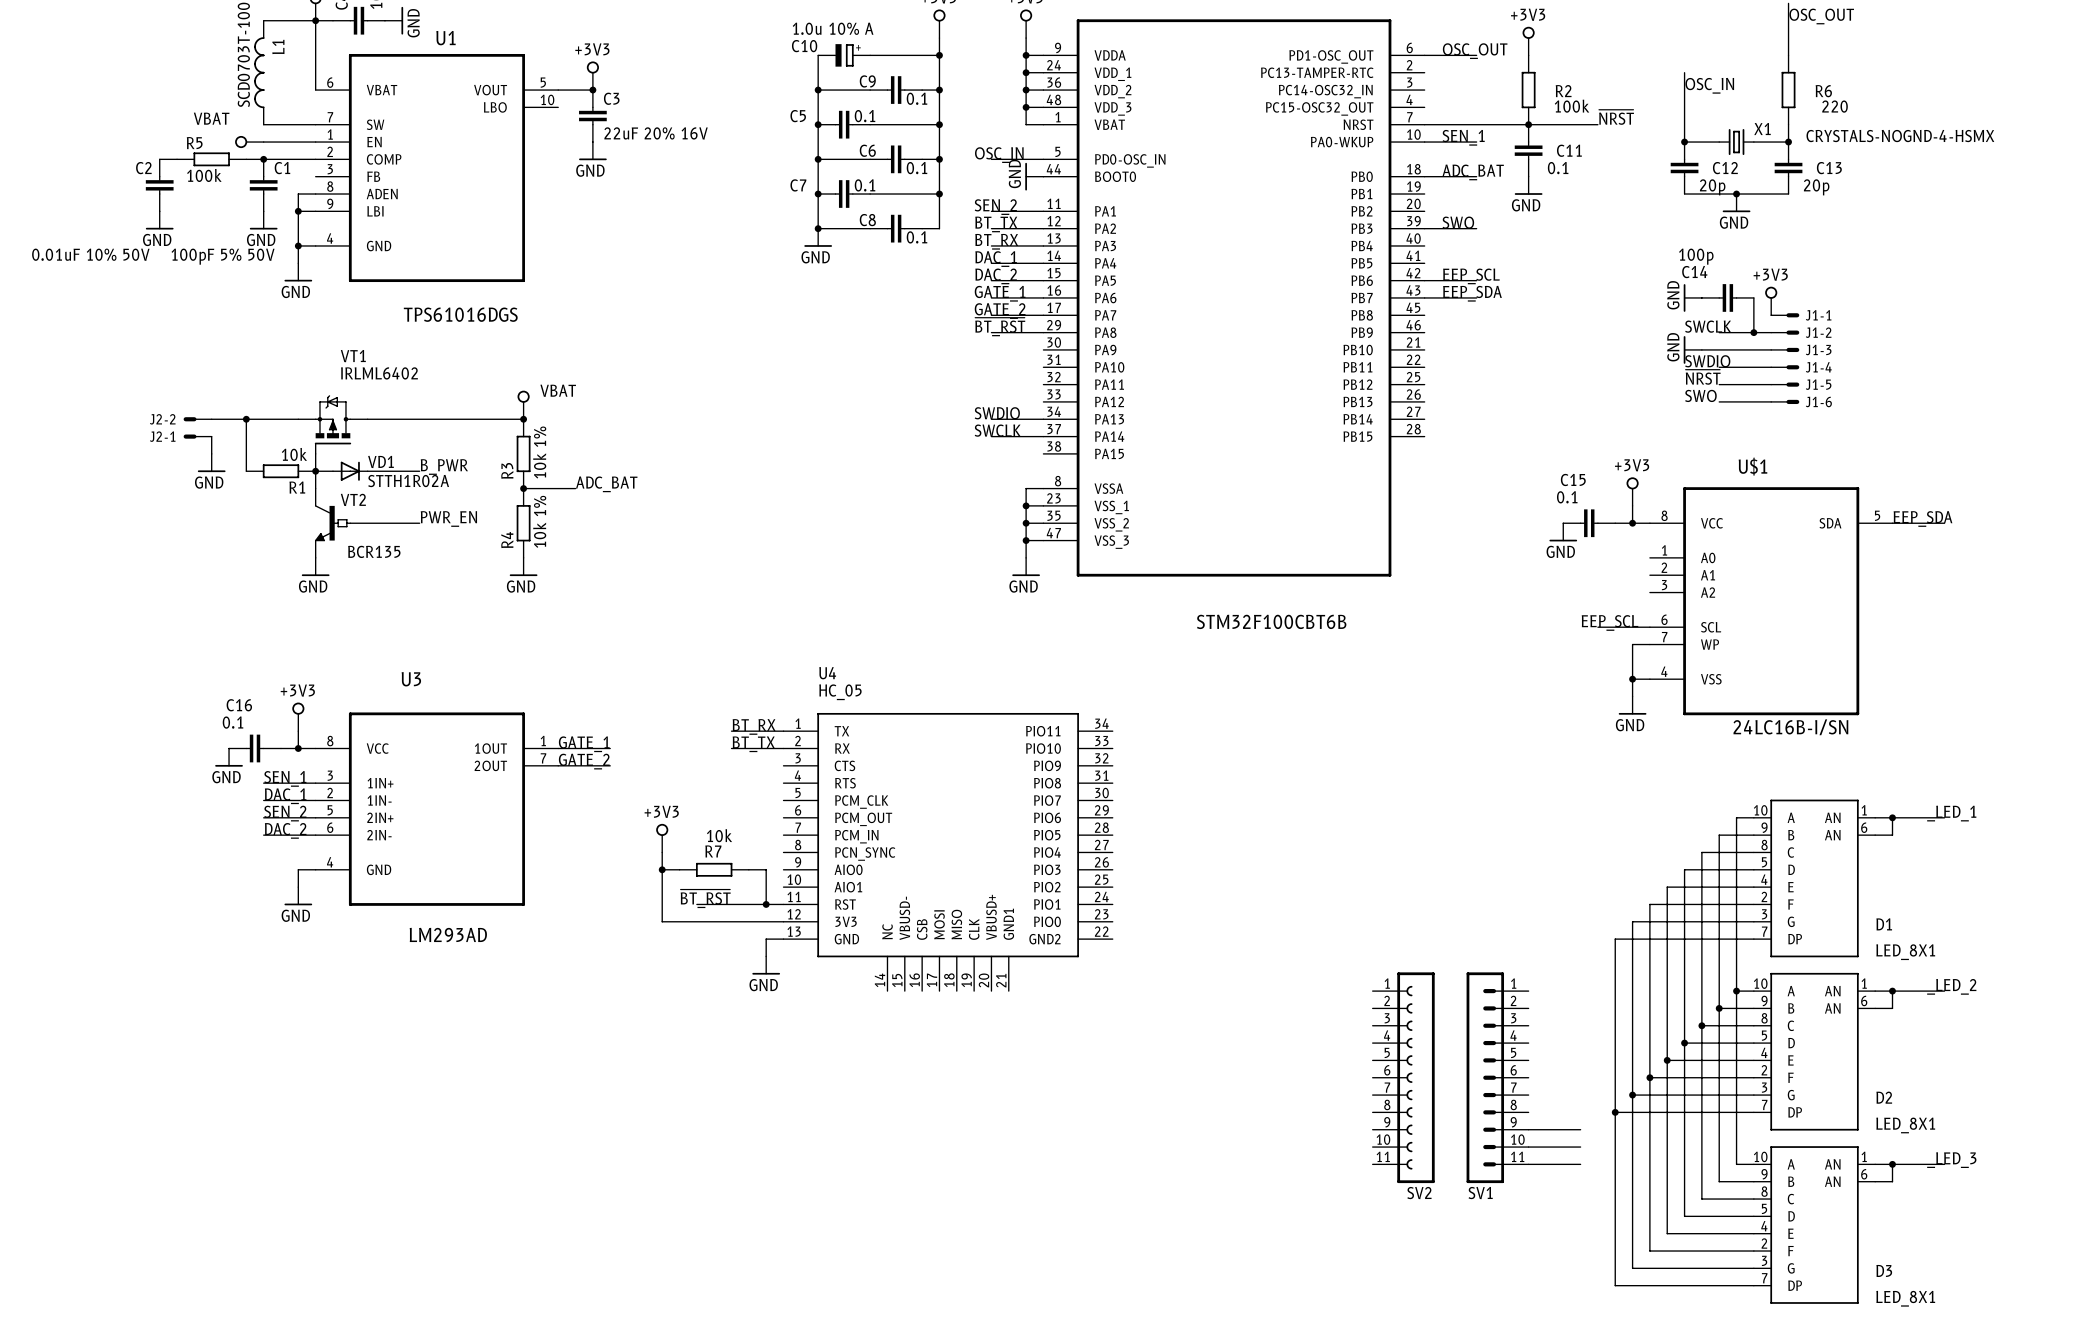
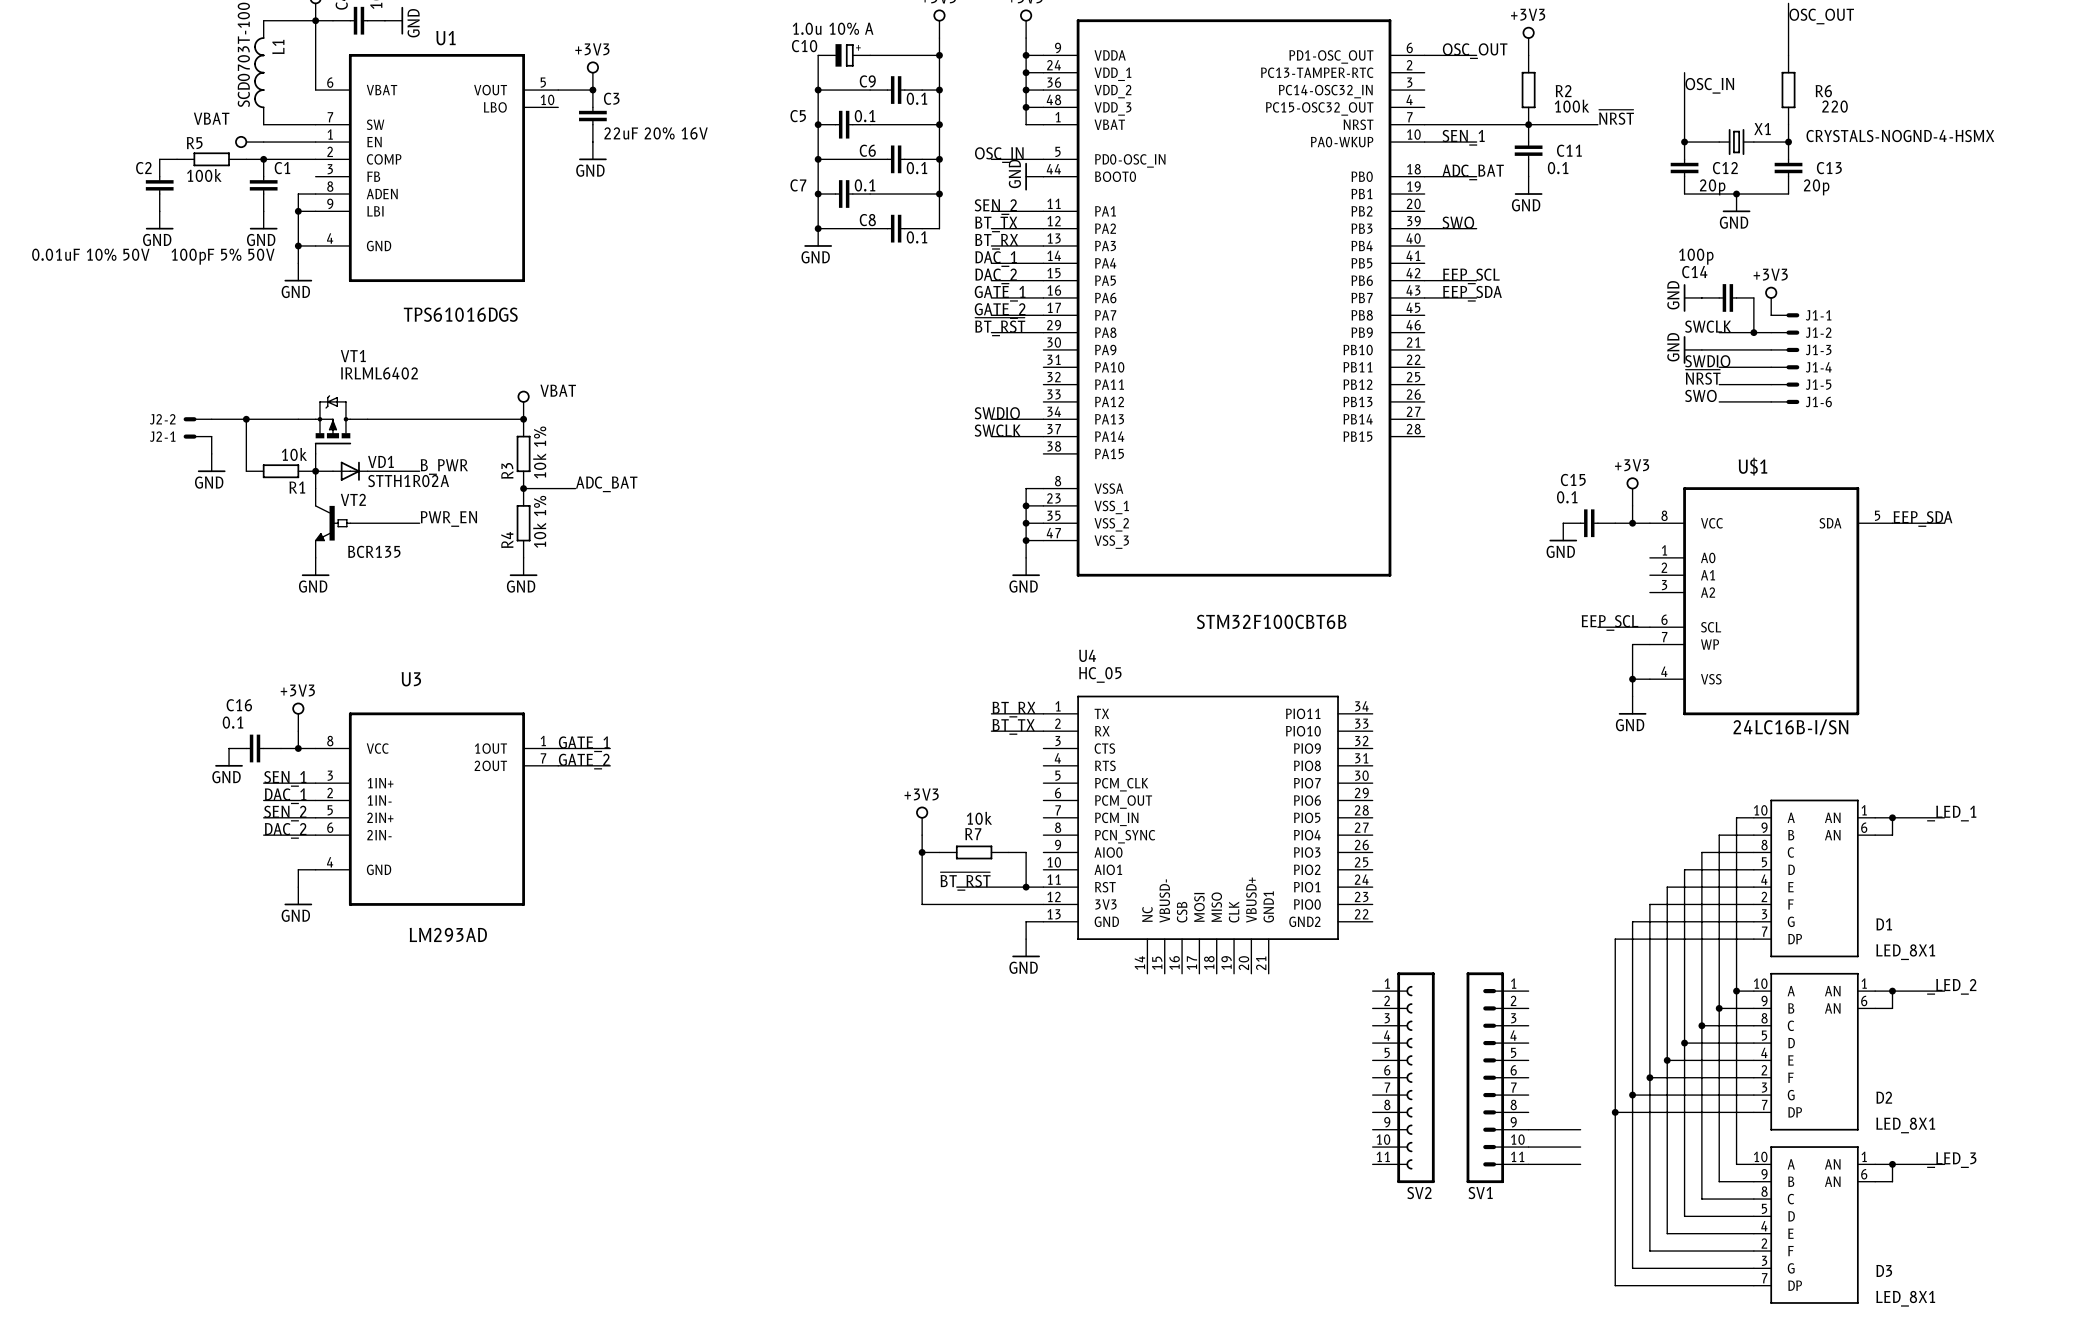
label: none -> BT_RX (1014, 709)
label: BT_RX (754, 726) -> none
label: none -> BT_TX (1013, 726)
wire: (731, 731) (783, 731) -> none
wire: none -> (991, 731) (1043, 731)
label: BT_TX (753, 744) -> none
wire: (731, 748) (783, 748) -> none
power symbol: none -> +3V3 (922, 820)
wire: none -> (922, 835) (922, 904) (1043, 904)
power symbol: +3V3 (662, 838) -> none
wire: (662, 852) (662, 921) (783, 921) -> none
wire: none -> (922, 852) (939, 852)
junction: none -> (922, 852)
U4 position: (948, 852) -> (1208, 834)
wire: none -> (1008, 852) (1026, 852) (1026, 887)
wire: (662, 869) (679, 869) -> none
junction: (662, 869) -> none
R7 position: (714, 869) -> (974, 852)
wire: (748, 869) (766, 869) (766, 904) -> none
label: none -> ~{BT_RST} (965, 881)
wire: none -> (956, 887) (1043, 887)
junction: none -> (1026, 887)
label: ~{BT_RST} (705, 898) -> none
wire: (696, 904) (783, 904) -> none
junction: (766, 904) -> none
wire: none -> (1043, 921) (1026, 921) (1026, 939)
wire: (783, 939) (766, 939) (766, 956) -> none
power symbol: none -> GND (1026, 948)
power symbol: GND (766, 965) -> none

